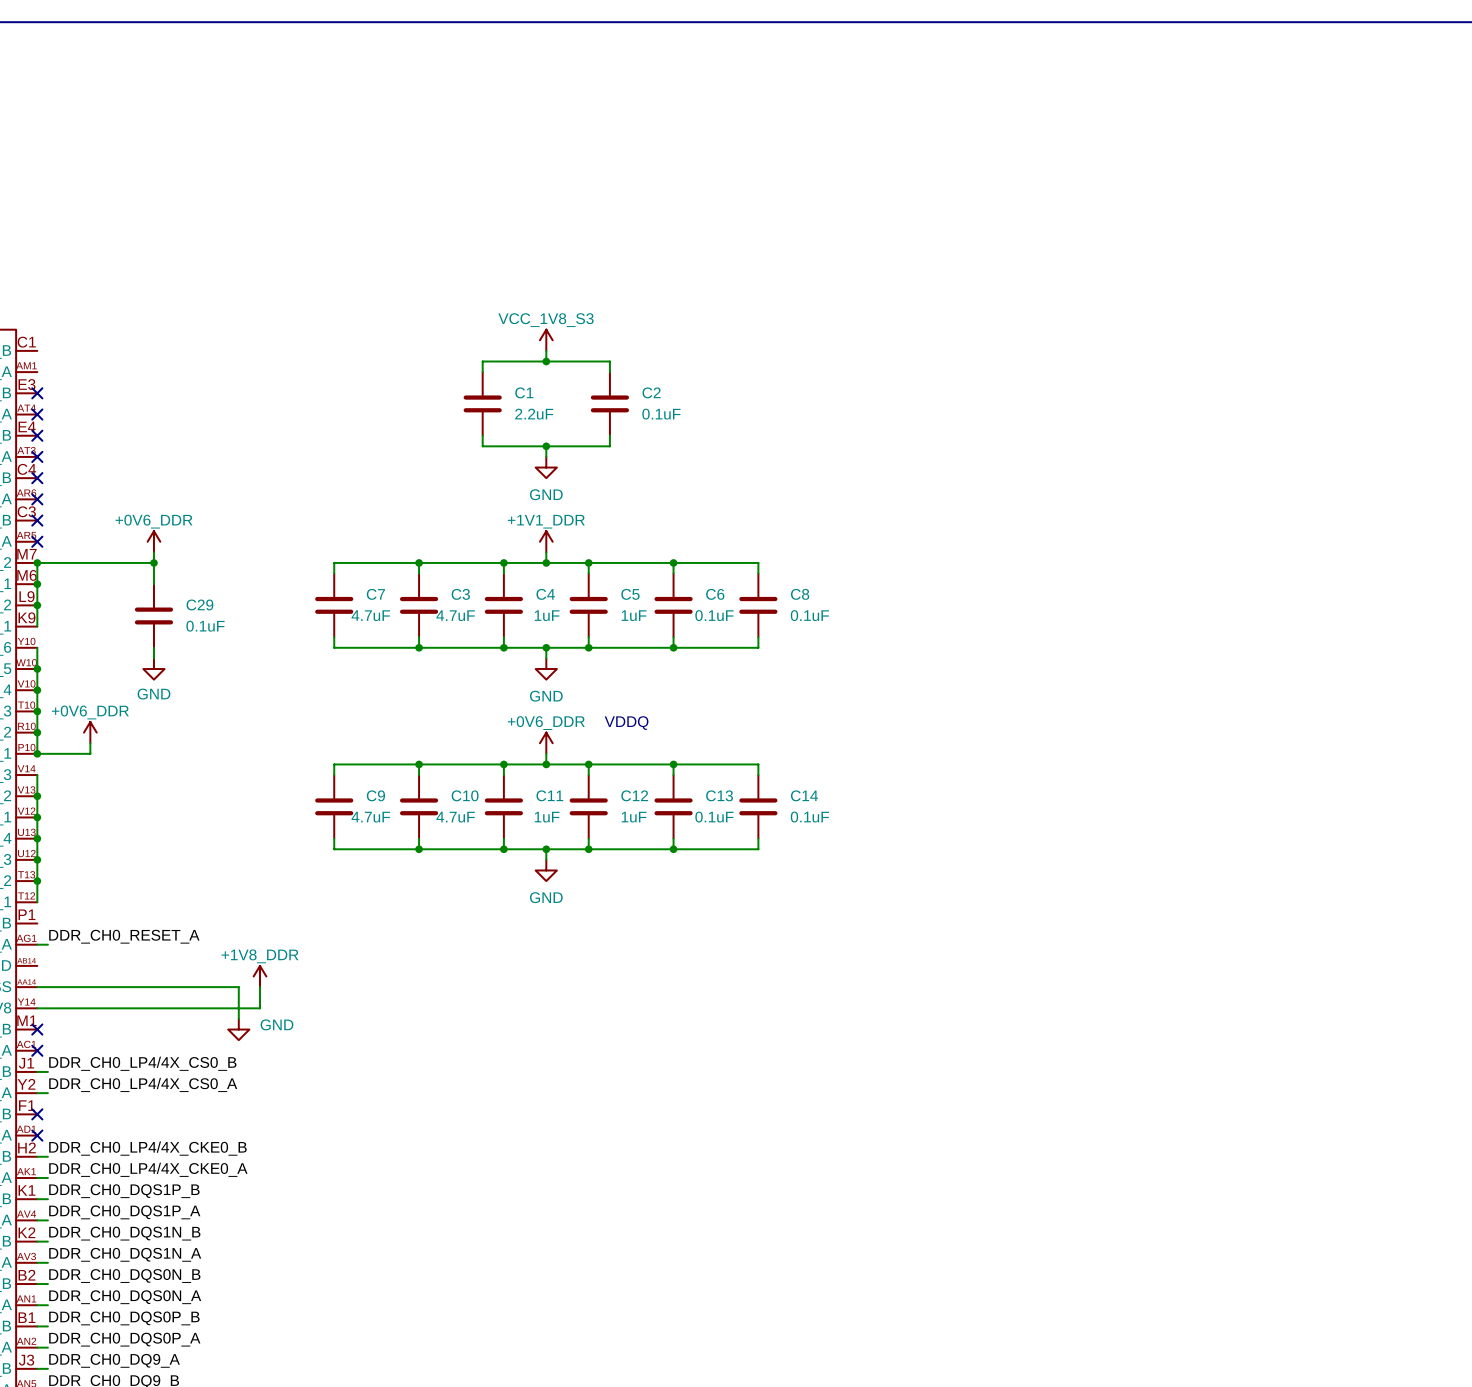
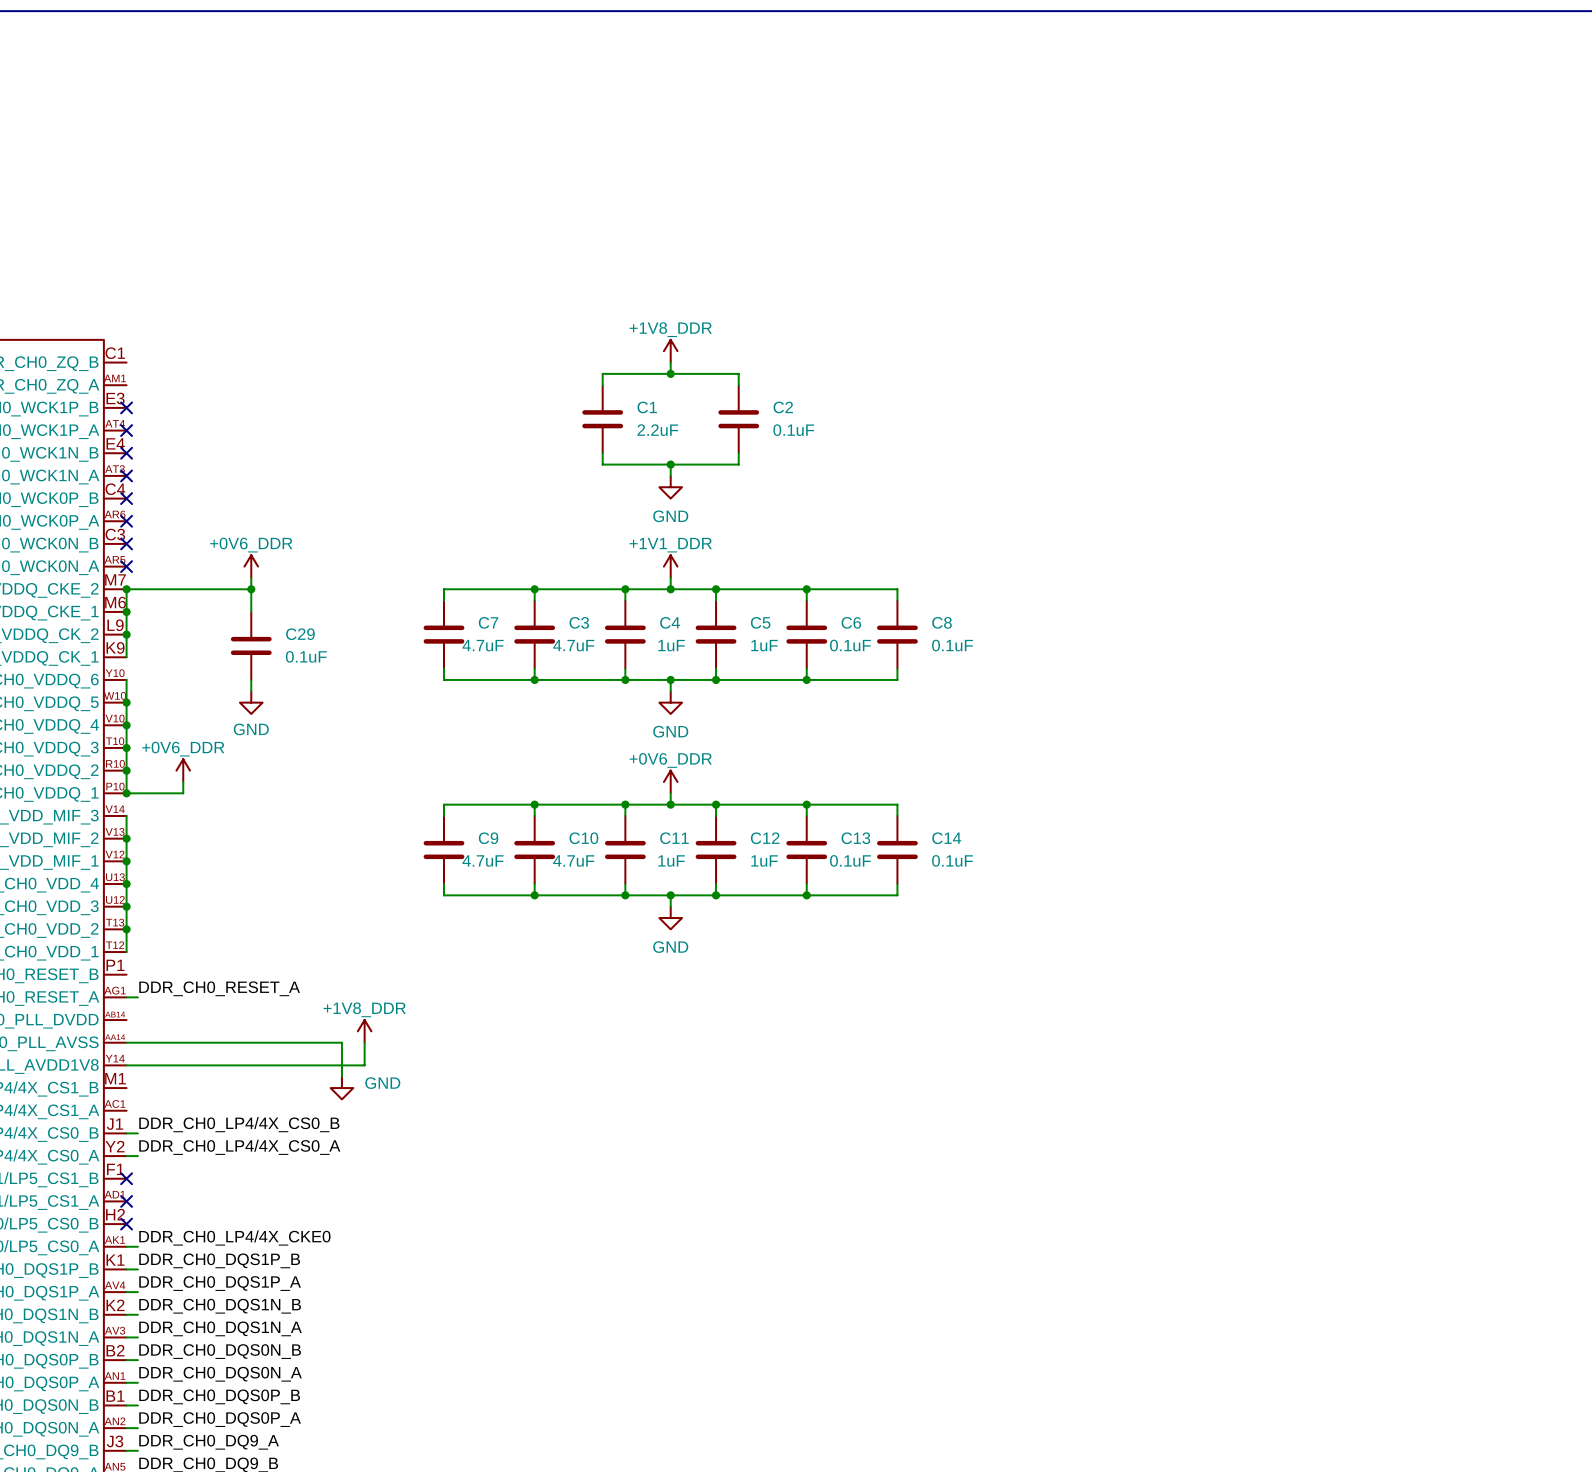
power symbol: VCC_1V8_S3 (546, 340) -> +1V8_DDR (670, 351)
text: VDDQ (626, 723) -> none
no-connect mark: (37, 1029) -> none
no-connect mark: (37, 1050) -> none
label: DDR_CH0_LP4/4X_CKE0_B (147, 1148) -> none
wire: (37, 1156) (47, 1156) -> none
no-connect mark: none -> (126, 1224)
label: DDR_CH0_LP4/4X_CKE0_A (148, 1169) -> DDR_CH0_LP4/4X_CKE0 (234, 1237)

